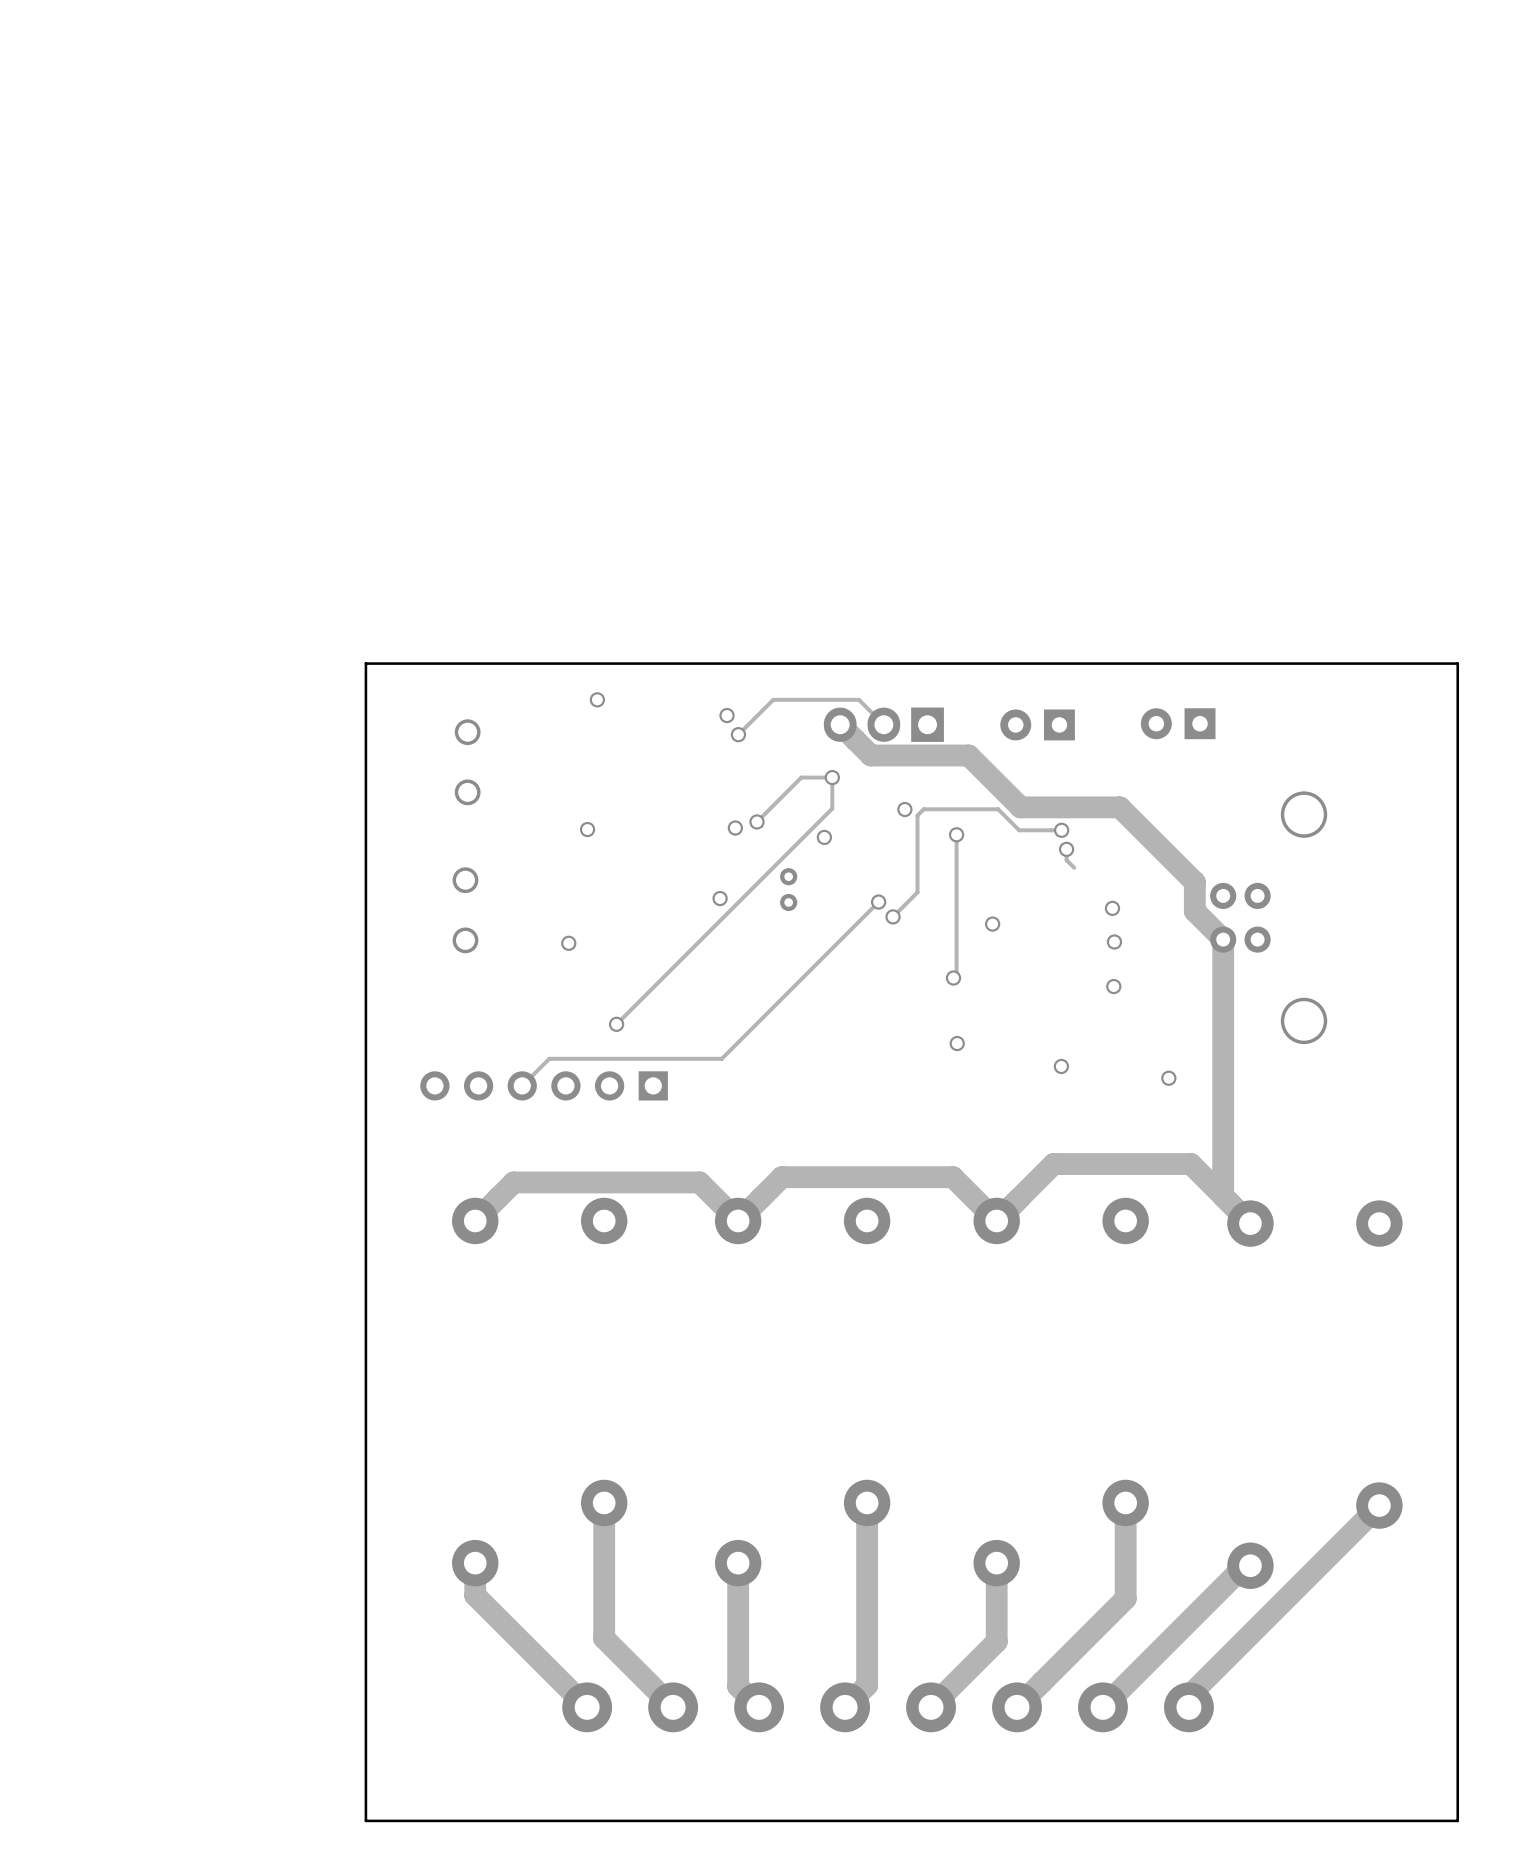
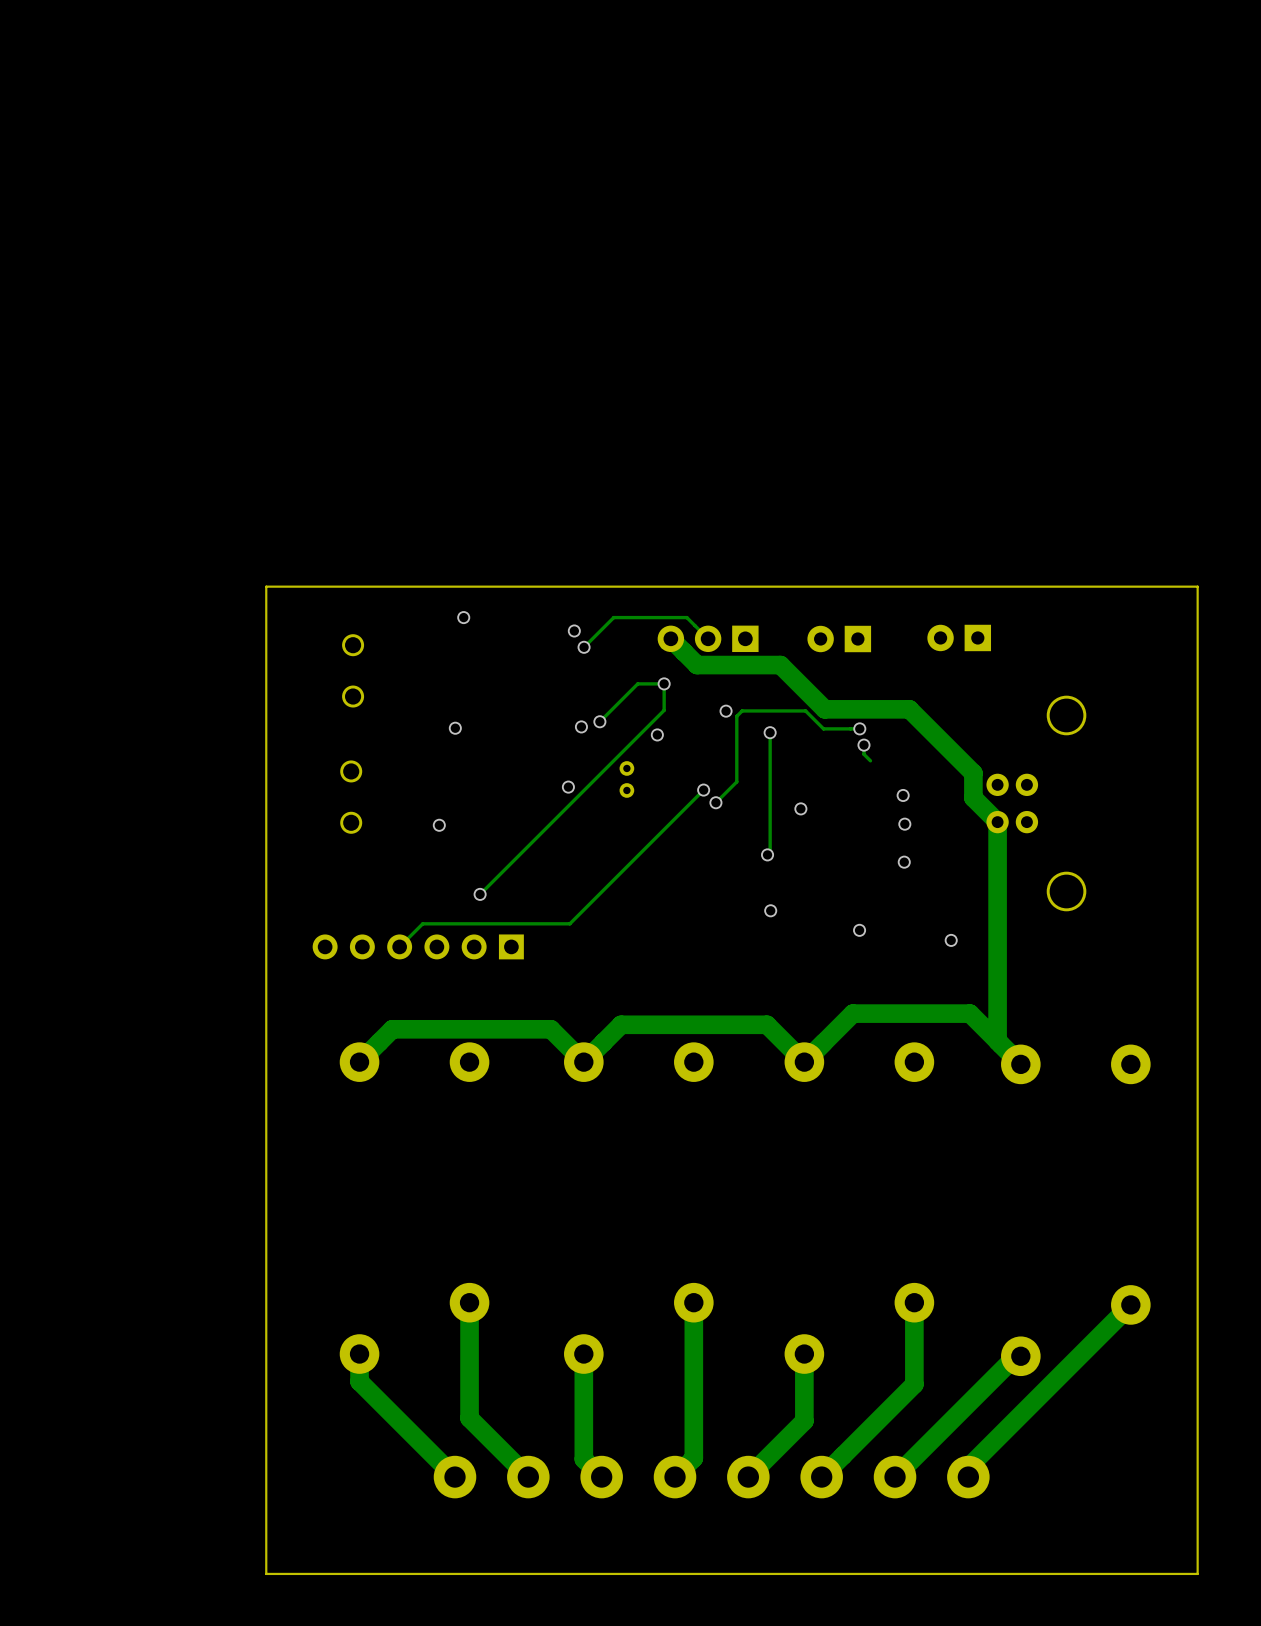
part footprint: [823, 707, 944, 742] -> [657, 625, 759, 653]

